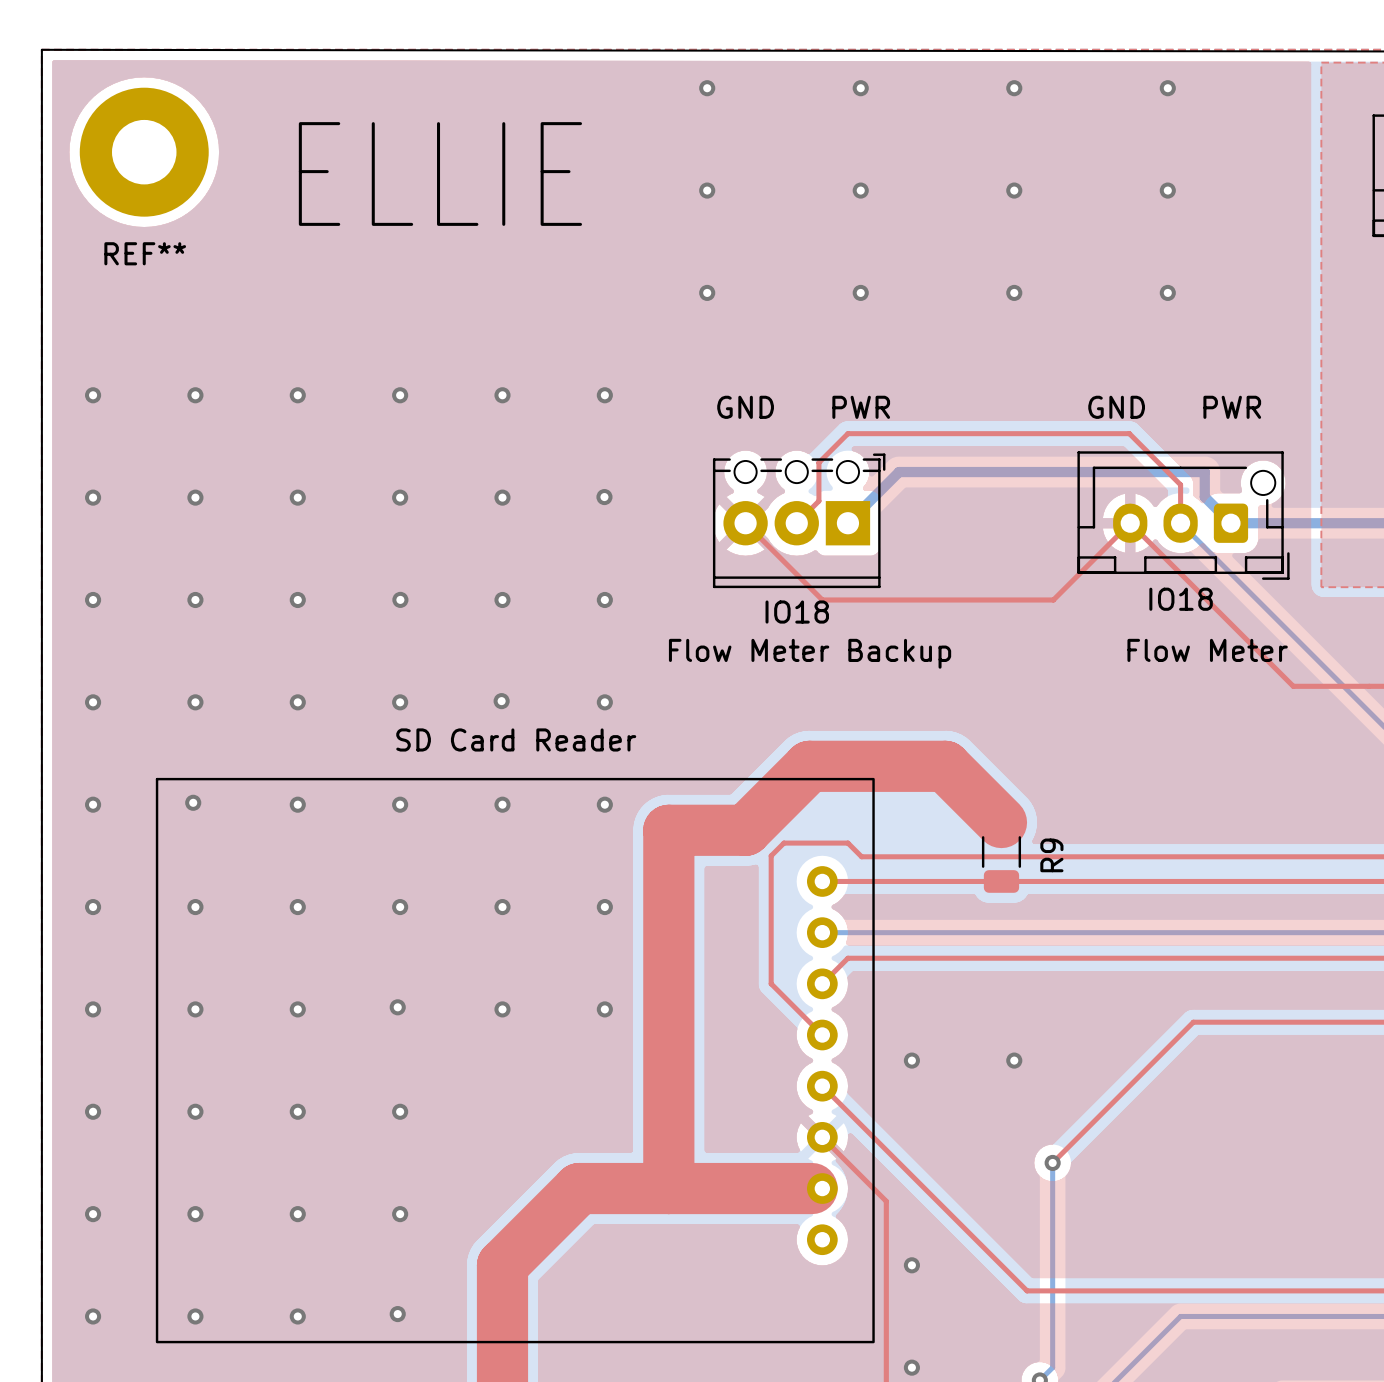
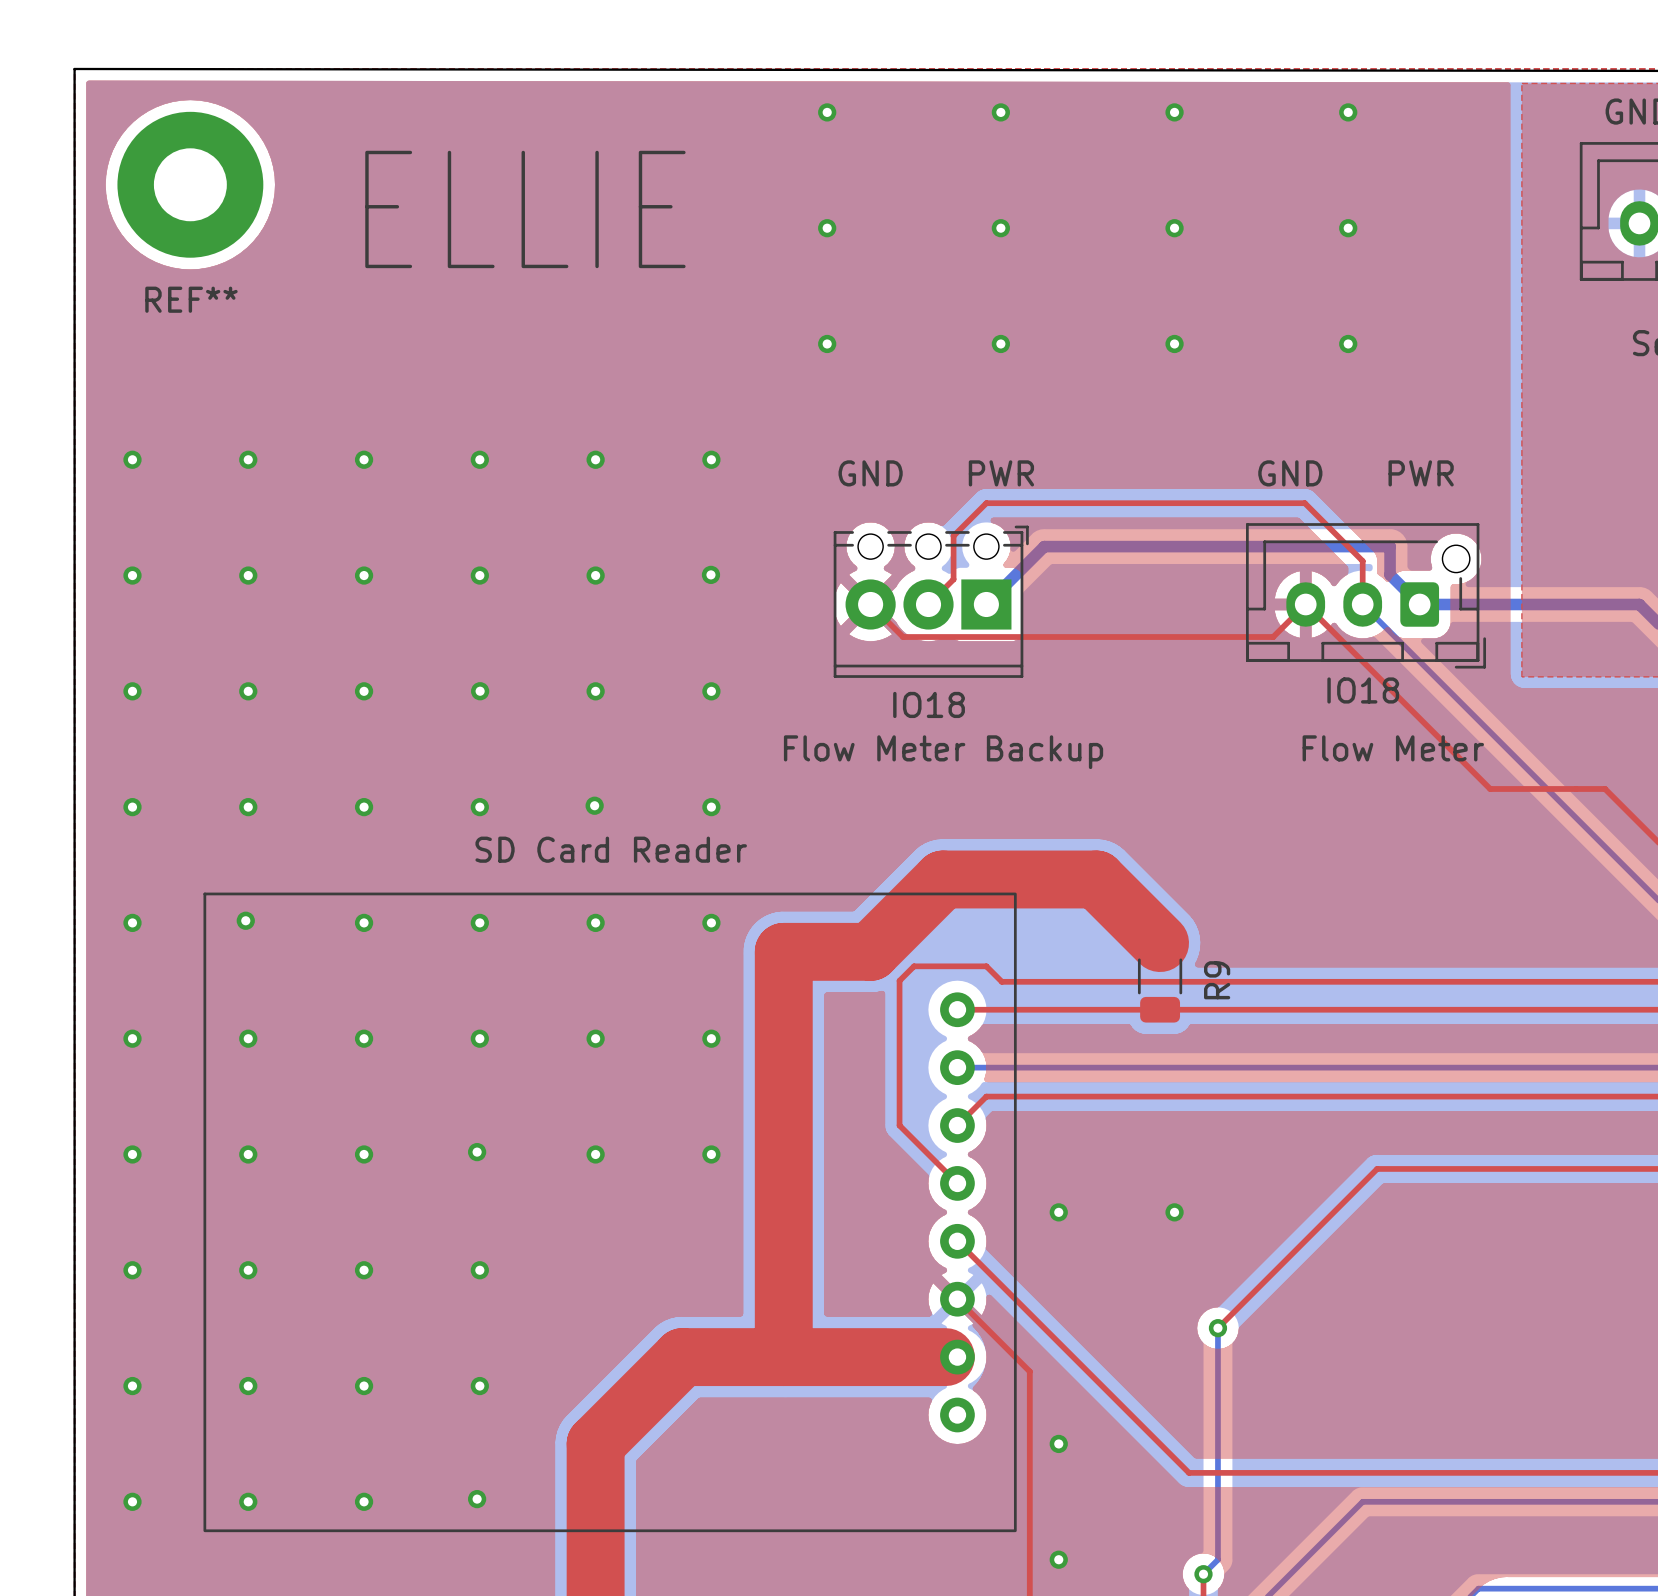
top track: (774, 551) (822, 599) (1053, 599) (1101, 551) -> (903, 637) (1273, 637)

